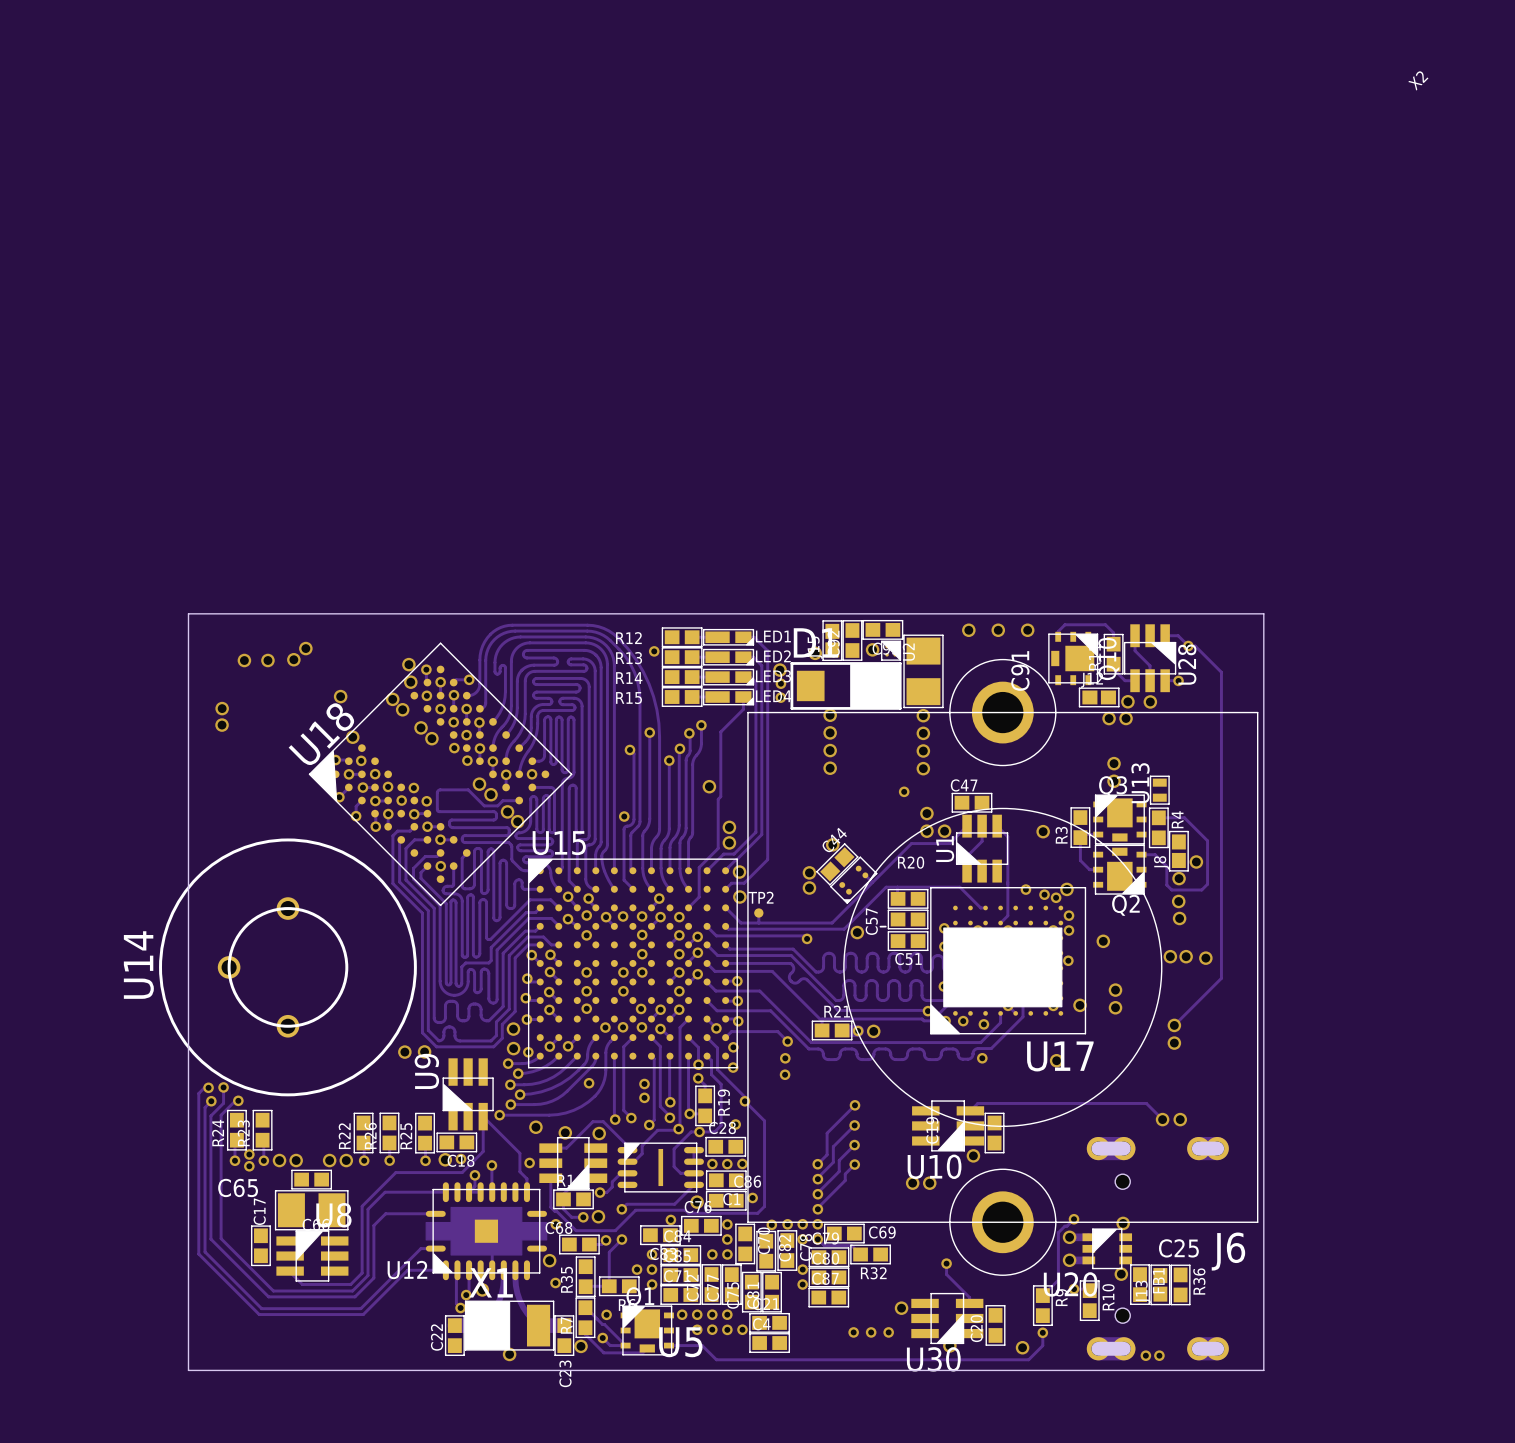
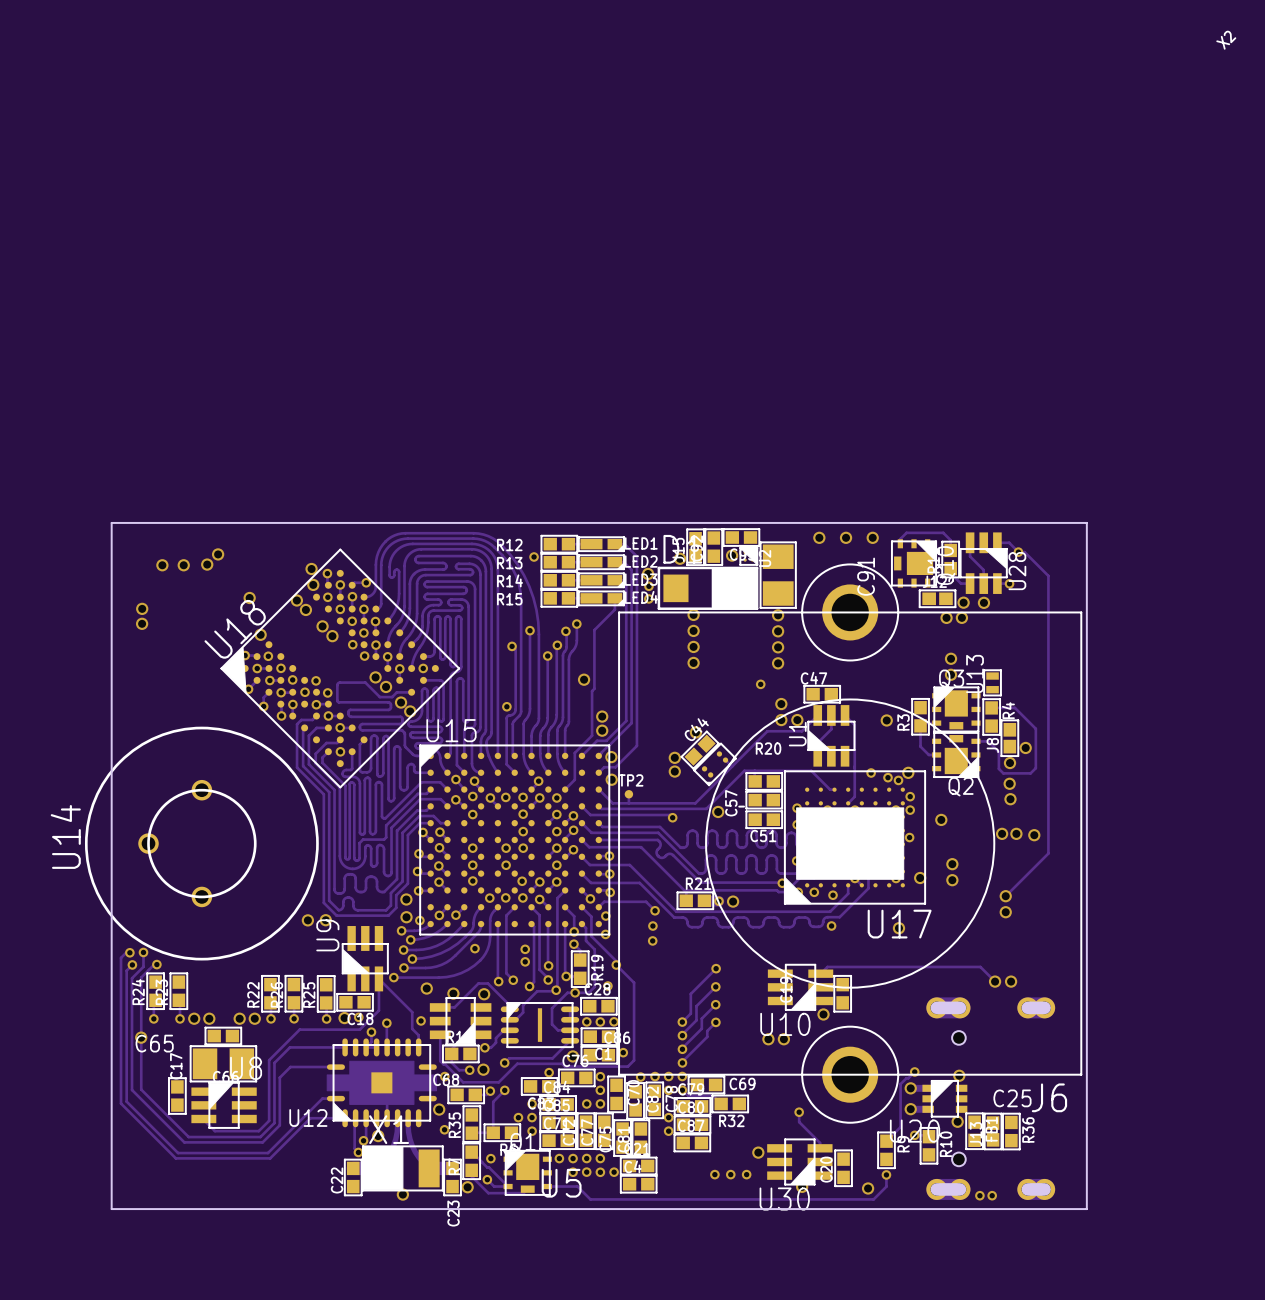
via: (249, 1154) -> none
via: (249, 1166) -> none
via: none -> (141, 1037)

